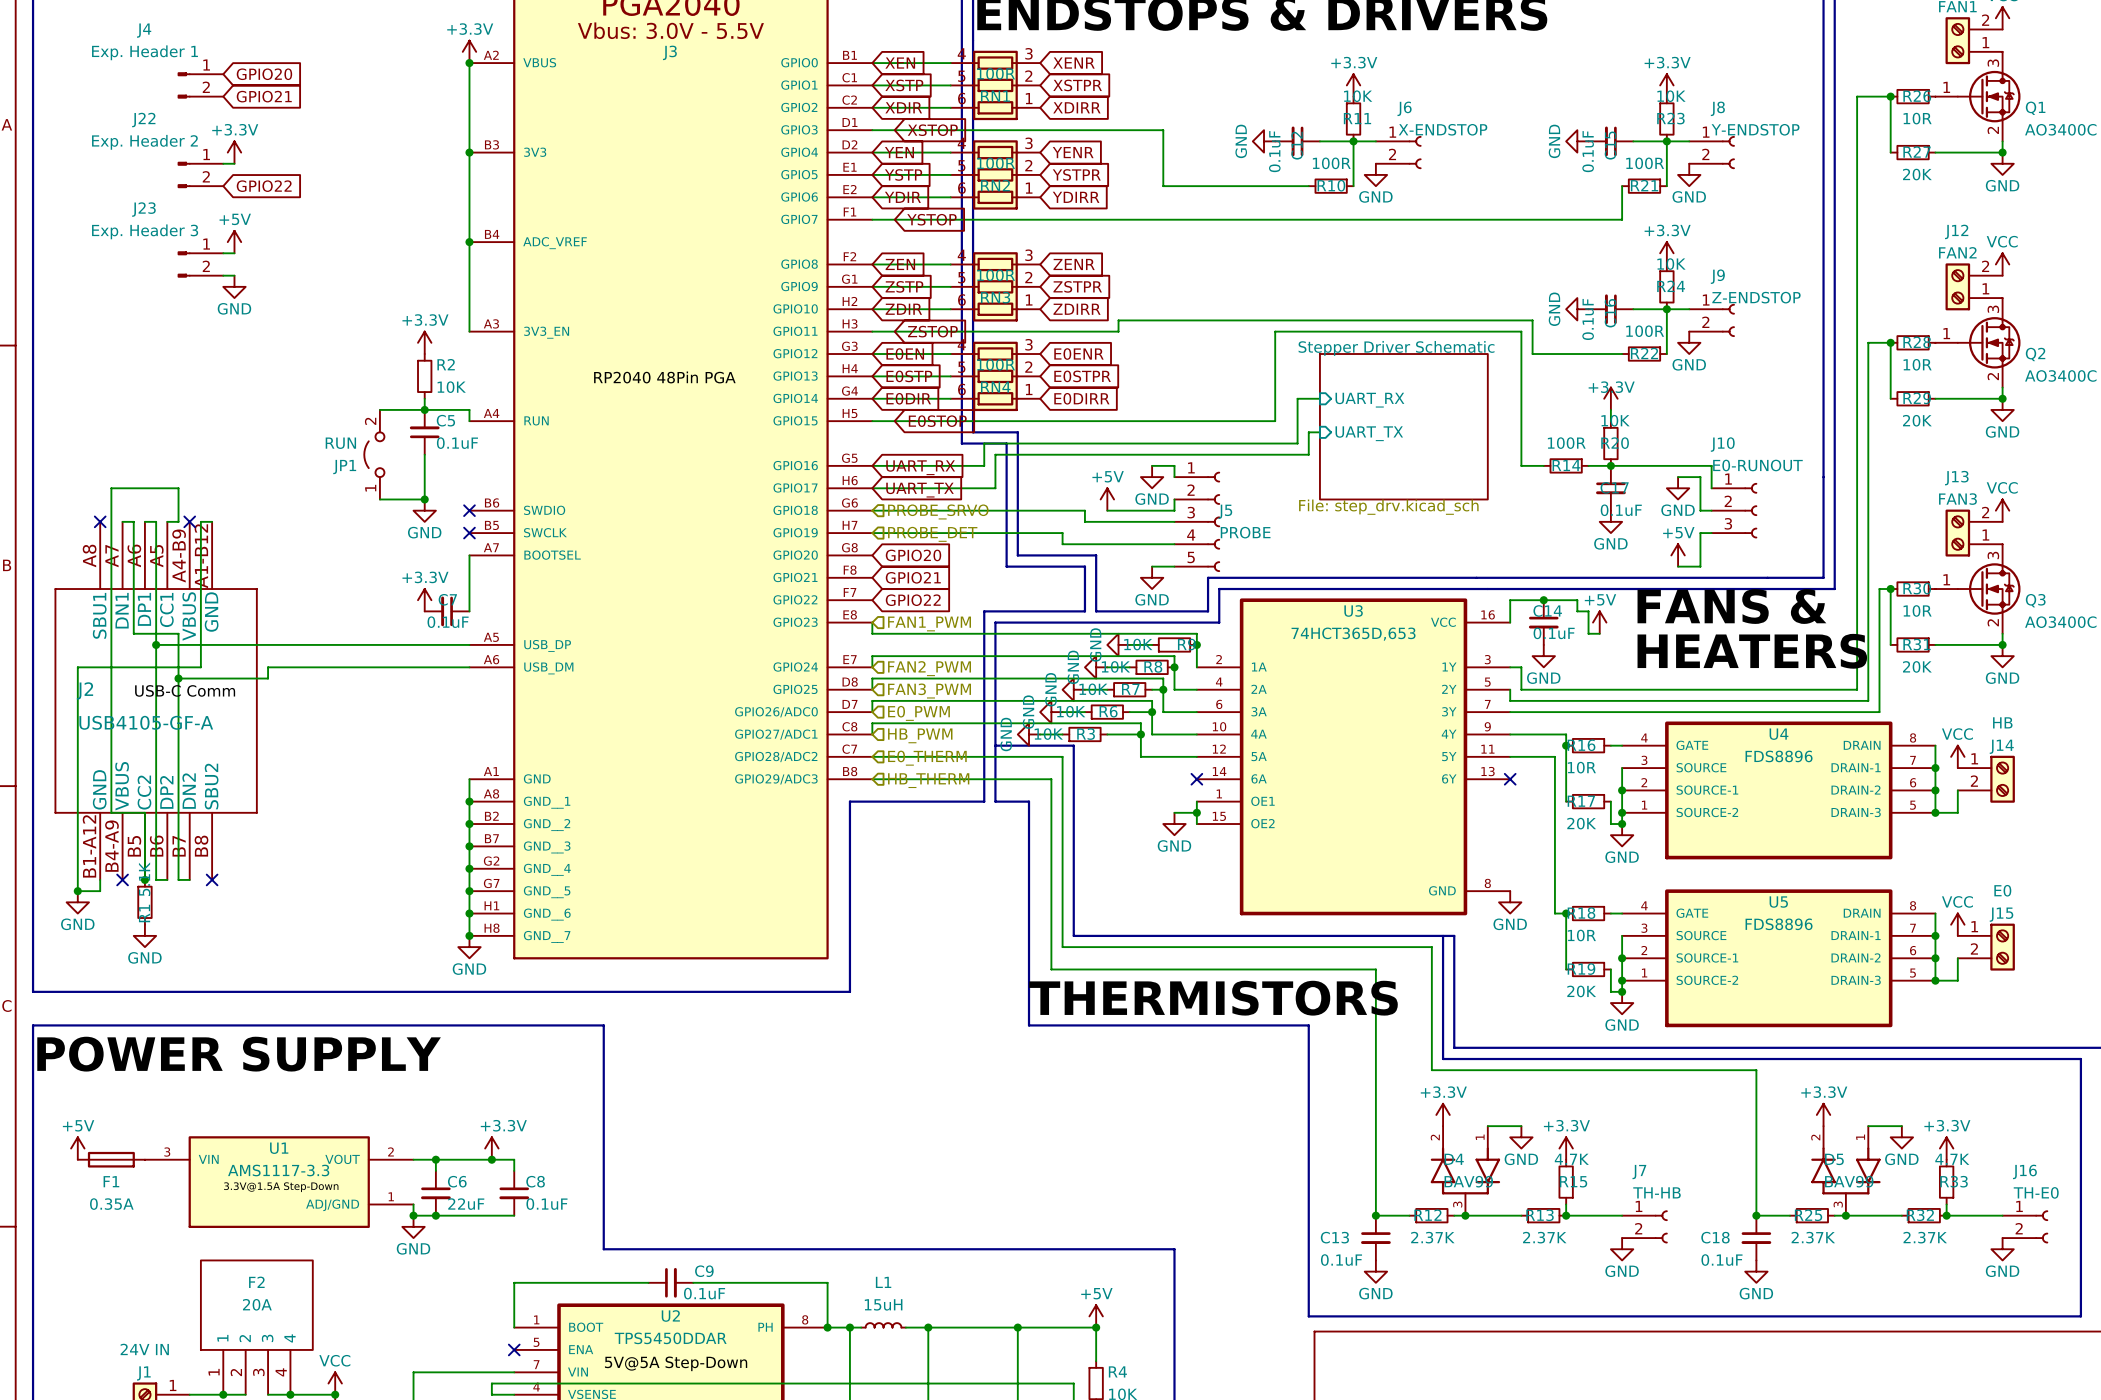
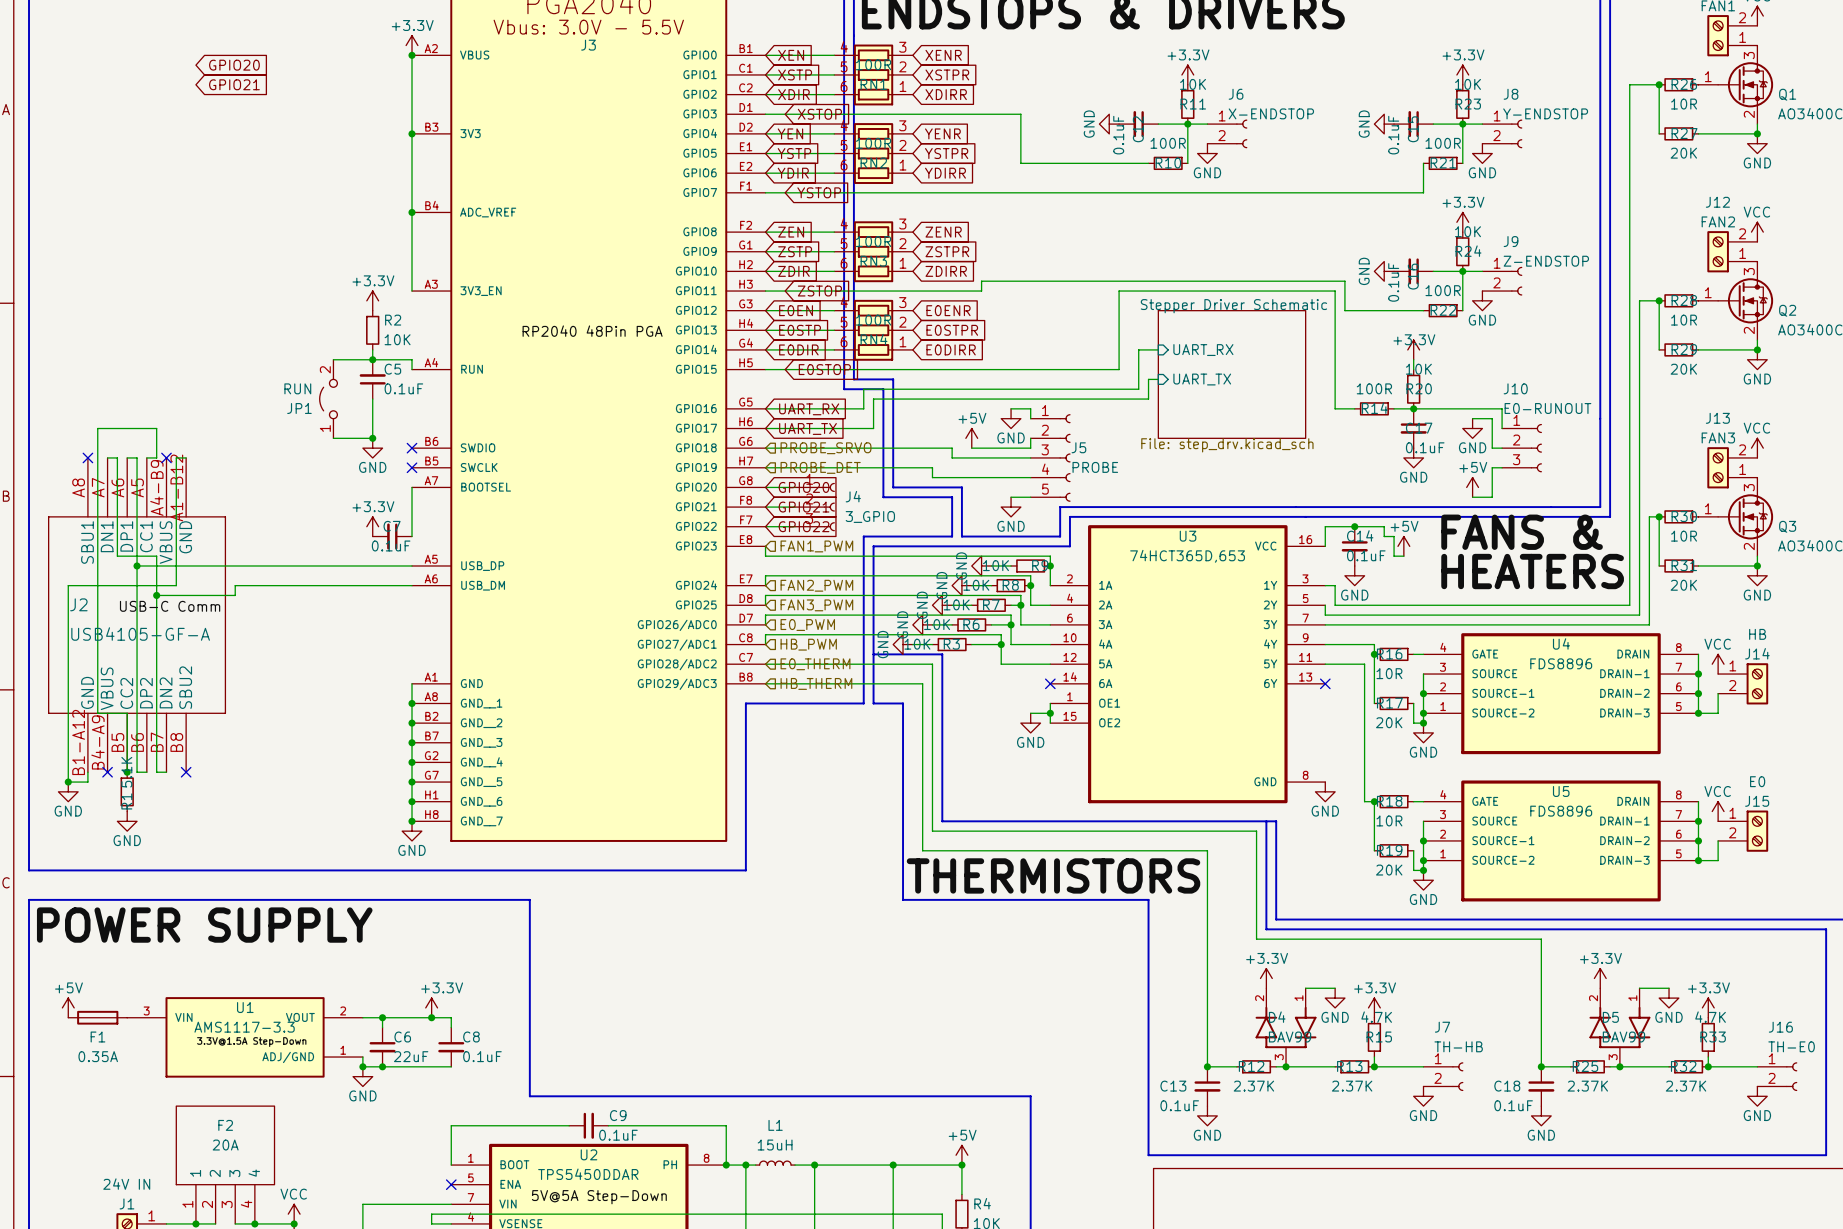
J4 name position: J4 (144, 30) -> J4 (853, 496)
J4 value: Exp. Header 1 (145, 52) -> 3_GPIO (870, 516)
J4 symbol: [177, 72, 224, 99] -> [794, 482, 835, 532]
power symbol: +3.3V (234, 152) -> none
wire: (223, 163) (234, 163) -> none
J22: Exp. Header 2 (200, 174) -> none
global label: GPIO22 (264, 186) -> none
power symbol: +5V (234, 242) -> none
wire: (223, 253) (234, 253) -> none
J23: Exp. Header 3 (200, 264) -> none
wire: (223, 275) (234, 275) -> none
power symbol: GND (234, 286) -> none
wire: none -> (765, 487) (794, 487)
wire: none -> (765, 507) (794, 507)
wire: none -> (765, 526) (794, 526)

